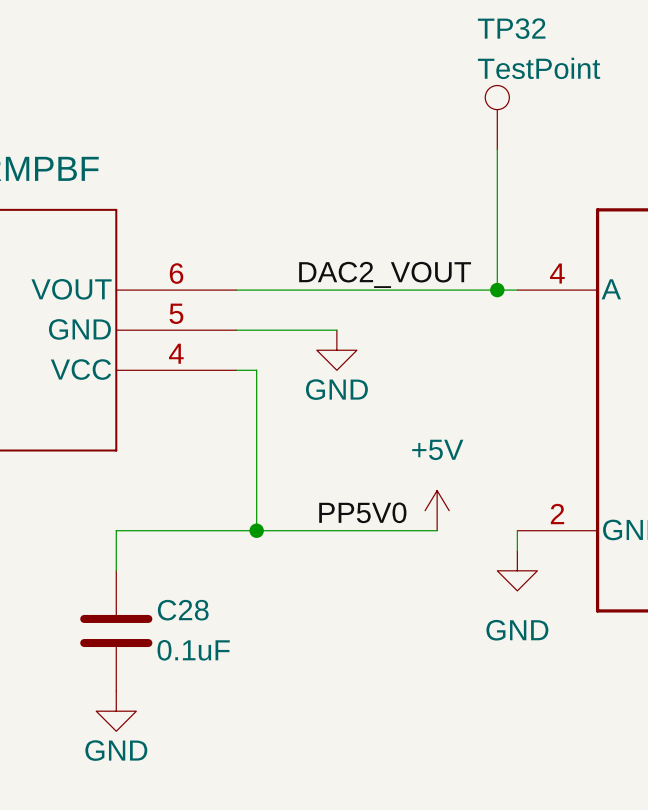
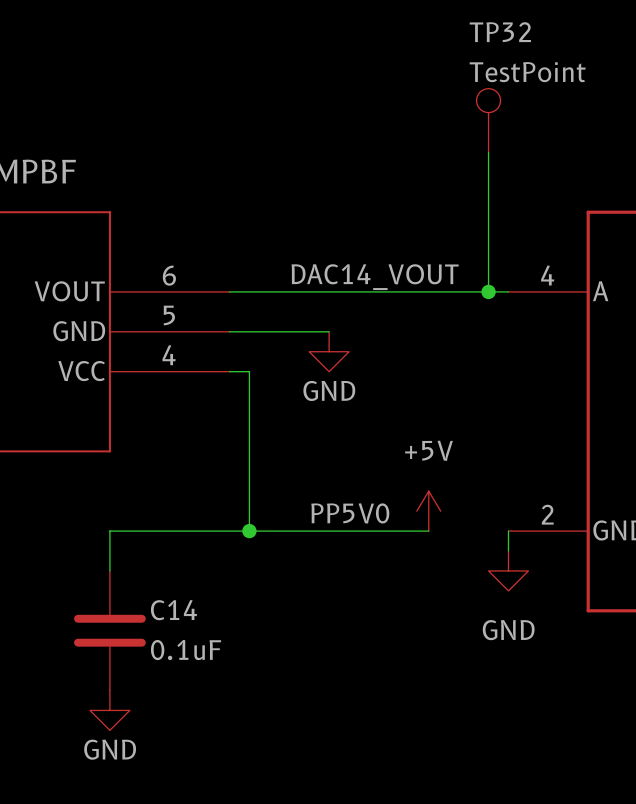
label: DAC2_VOUT (385, 274) -> DAC14_VOUT (375, 277)
C28 name: C28 (183, 610) -> C14 (173, 610)

